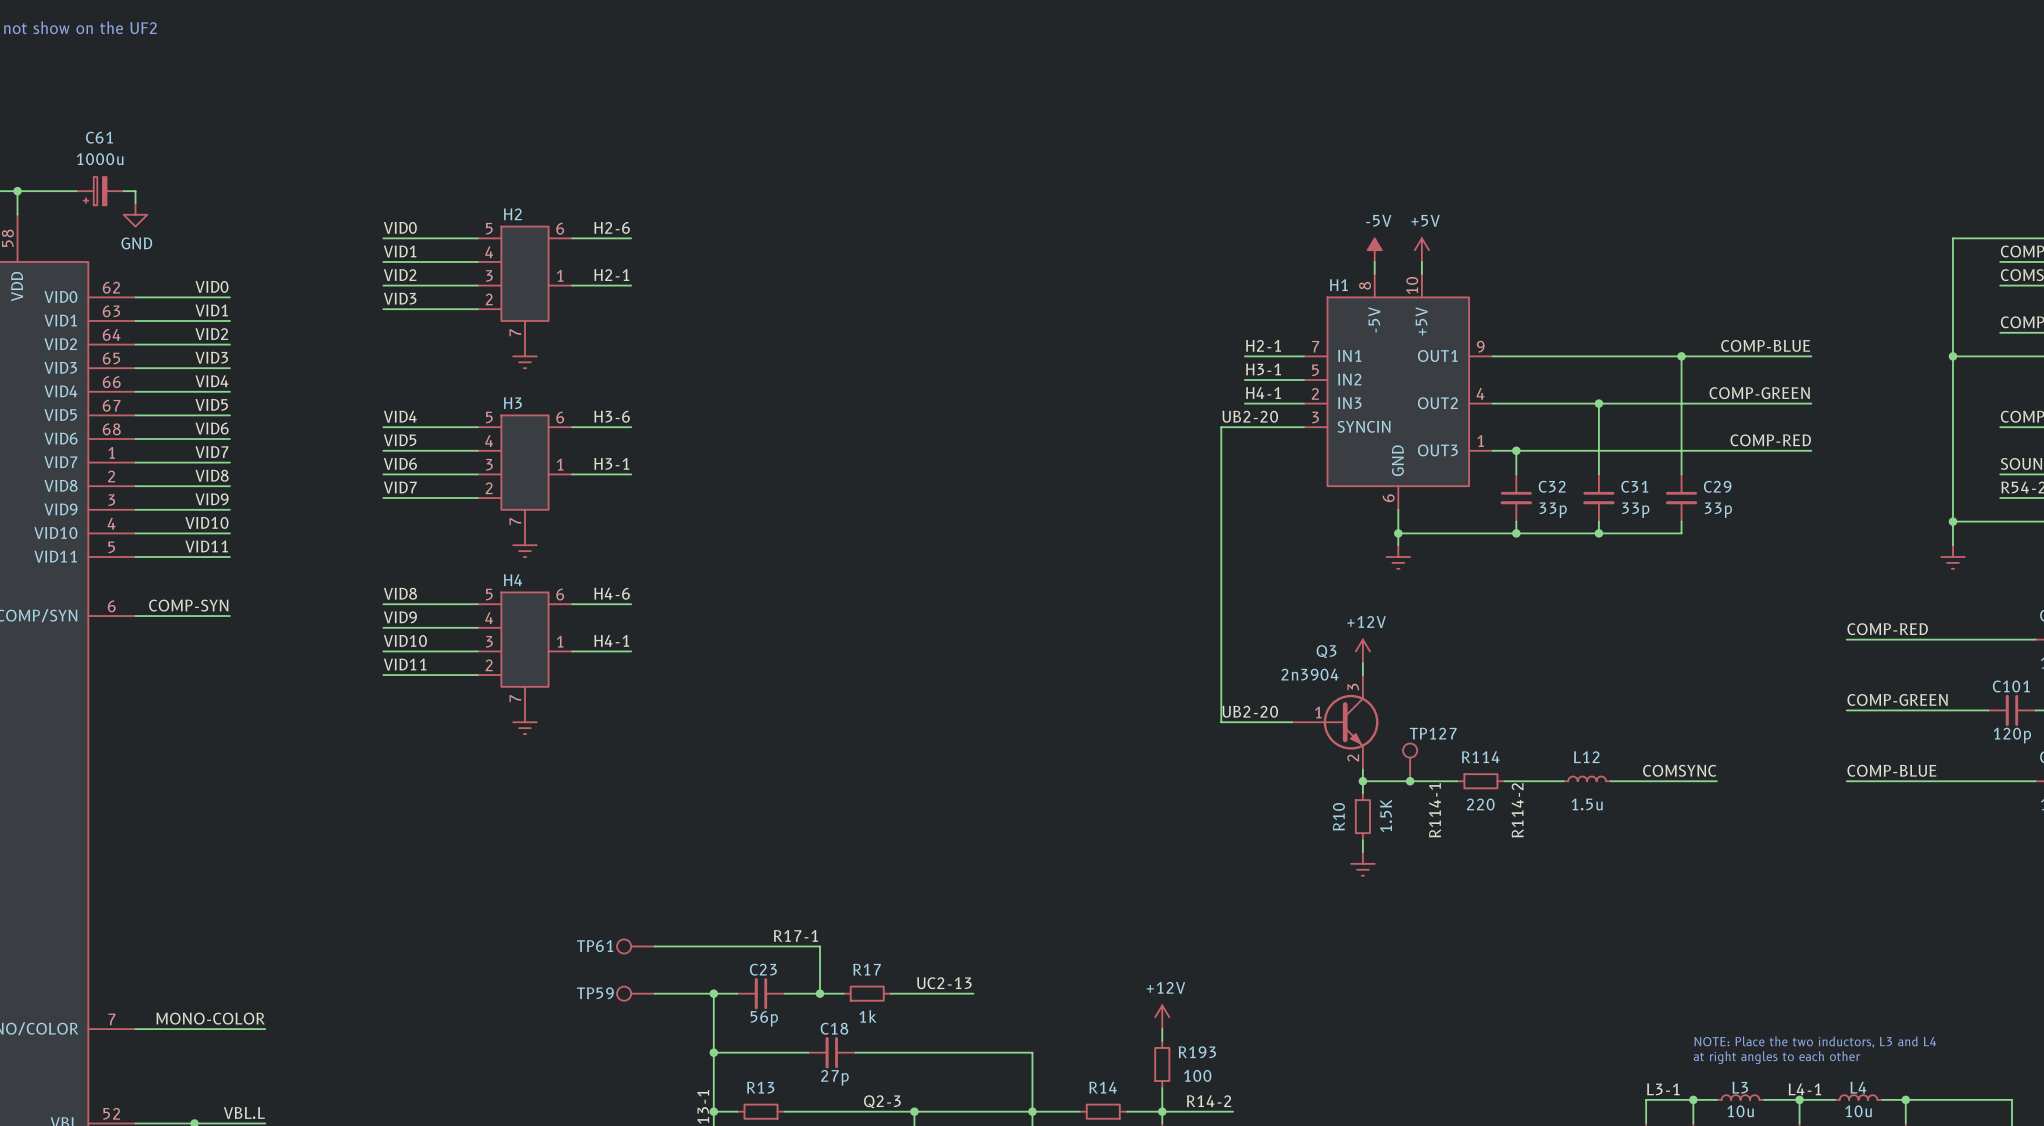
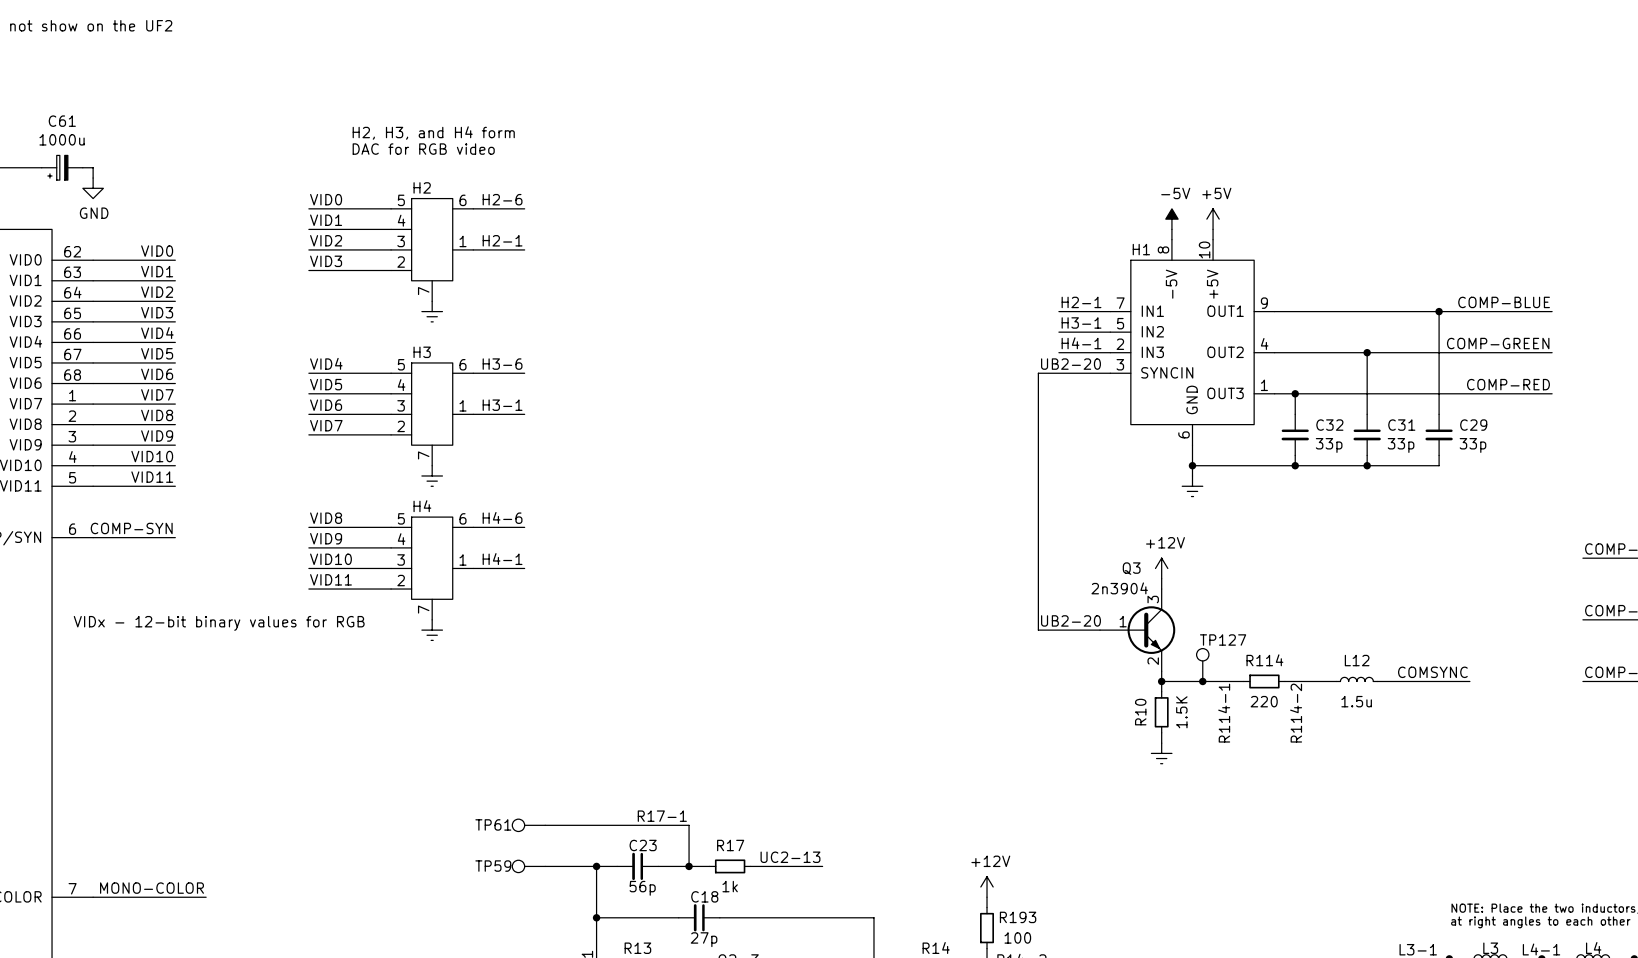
text: none -> H2, H3, and H4 form (433, 133)
text: none -> DAC for RGB video (423, 149)
text: none -> VIDx - 12-bit binary values for RGB (219, 623)

